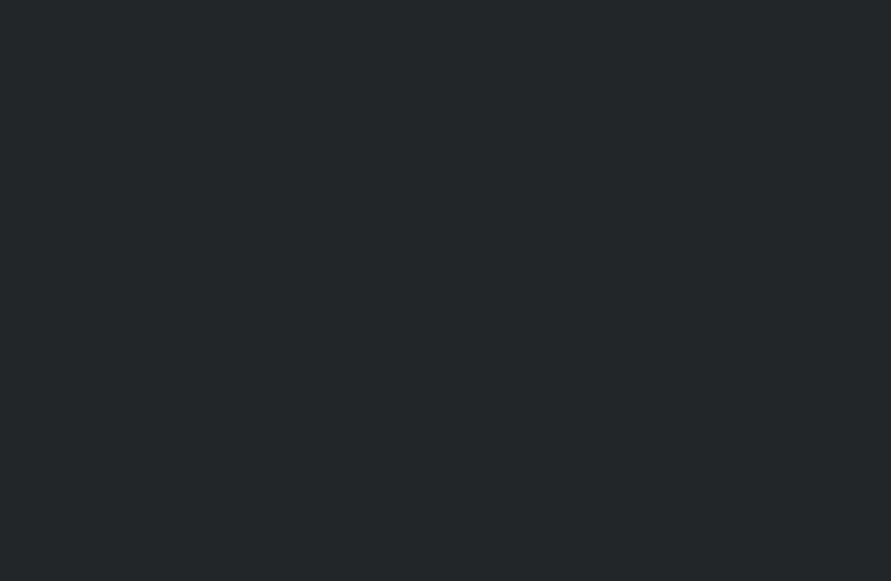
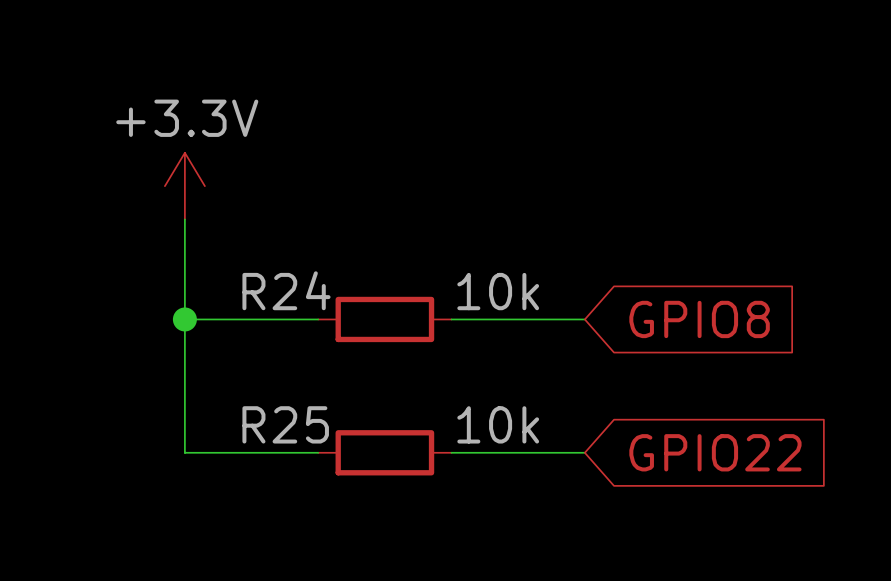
power symbol: none -> +3.3V (184, 186)
wire: none -> (184, 219) (184, 452) (318, 452)
wire: none -> (184, 319) (318, 319)
junction: none -> (184, 319)
R24: none -> 10k (384, 319)
wire: none -> (451, 319) (584, 319)
global label: none -> GPIO8 (699, 319)
R25: none -> 10k (384, 452)
wire: none -> (451, 452) (584, 452)
global label: none -> GPIO22 (715, 452)

